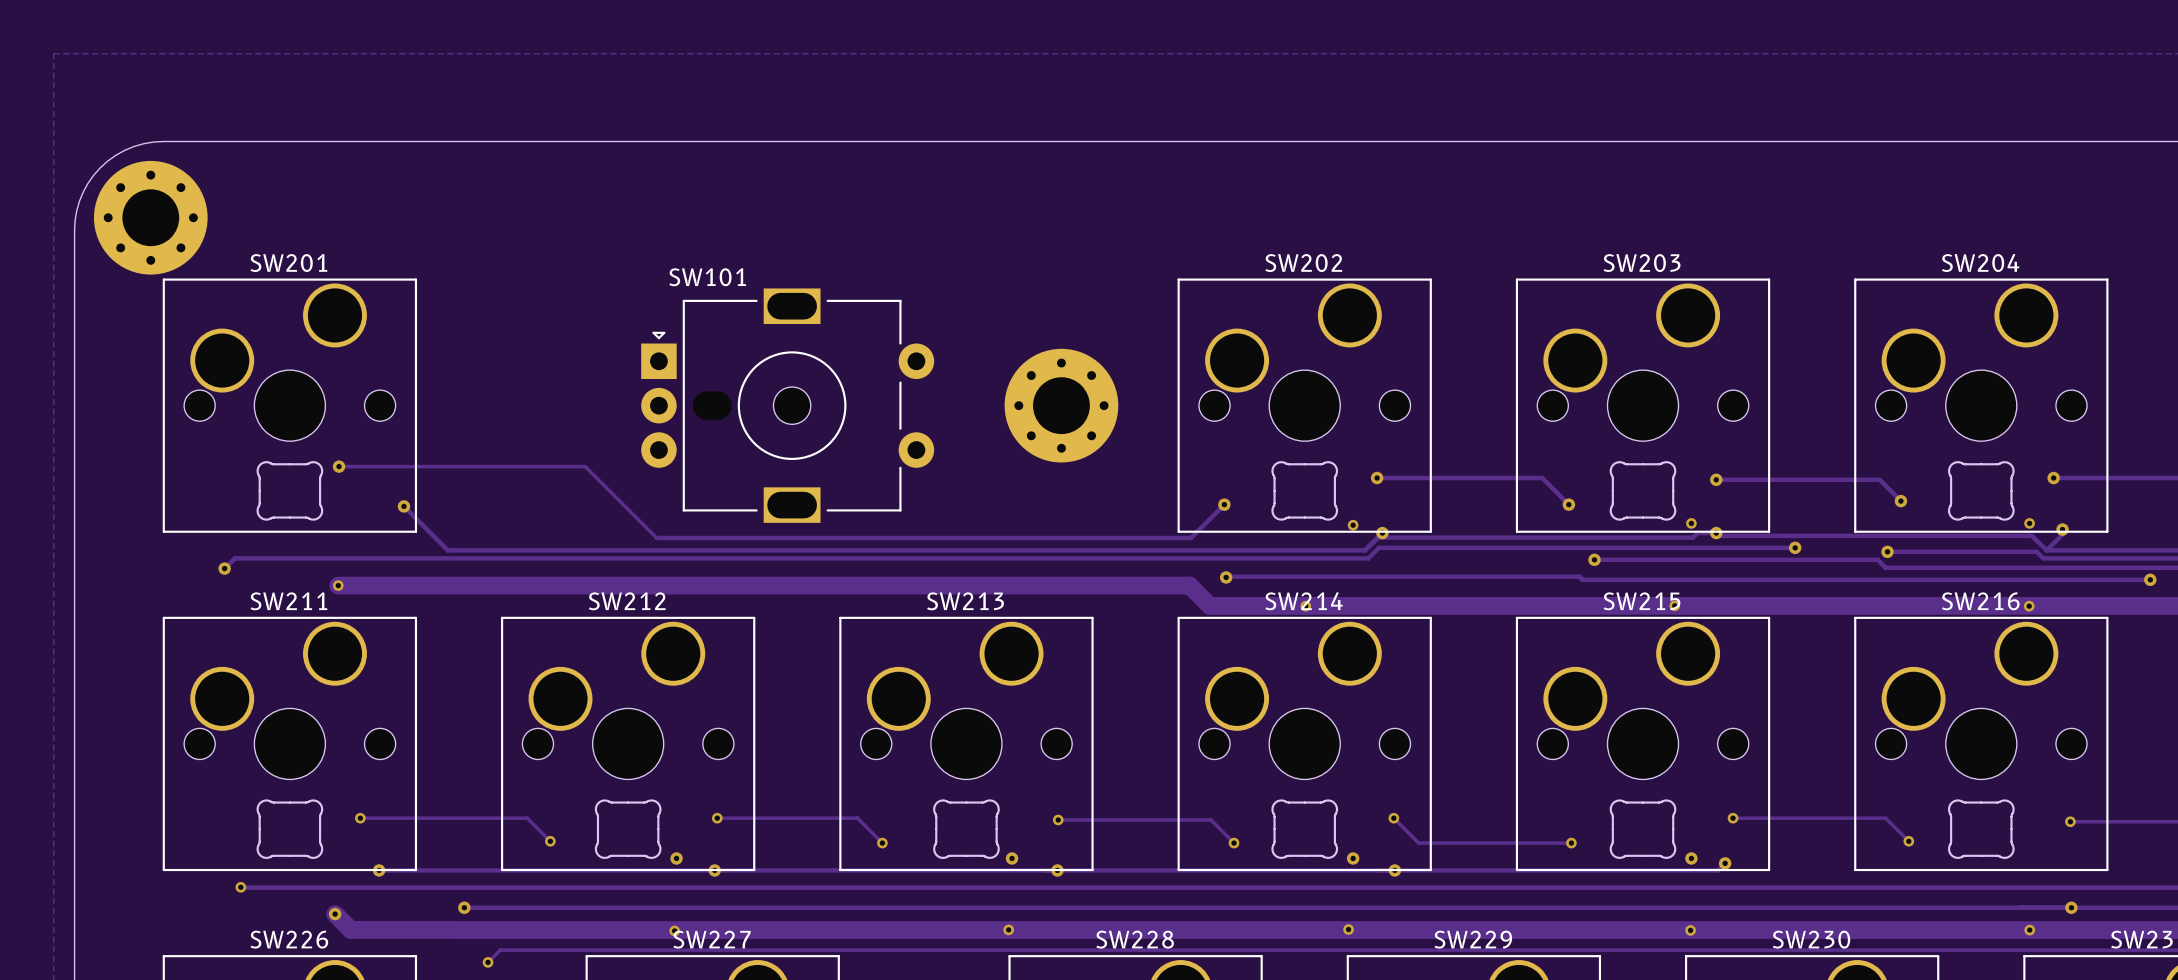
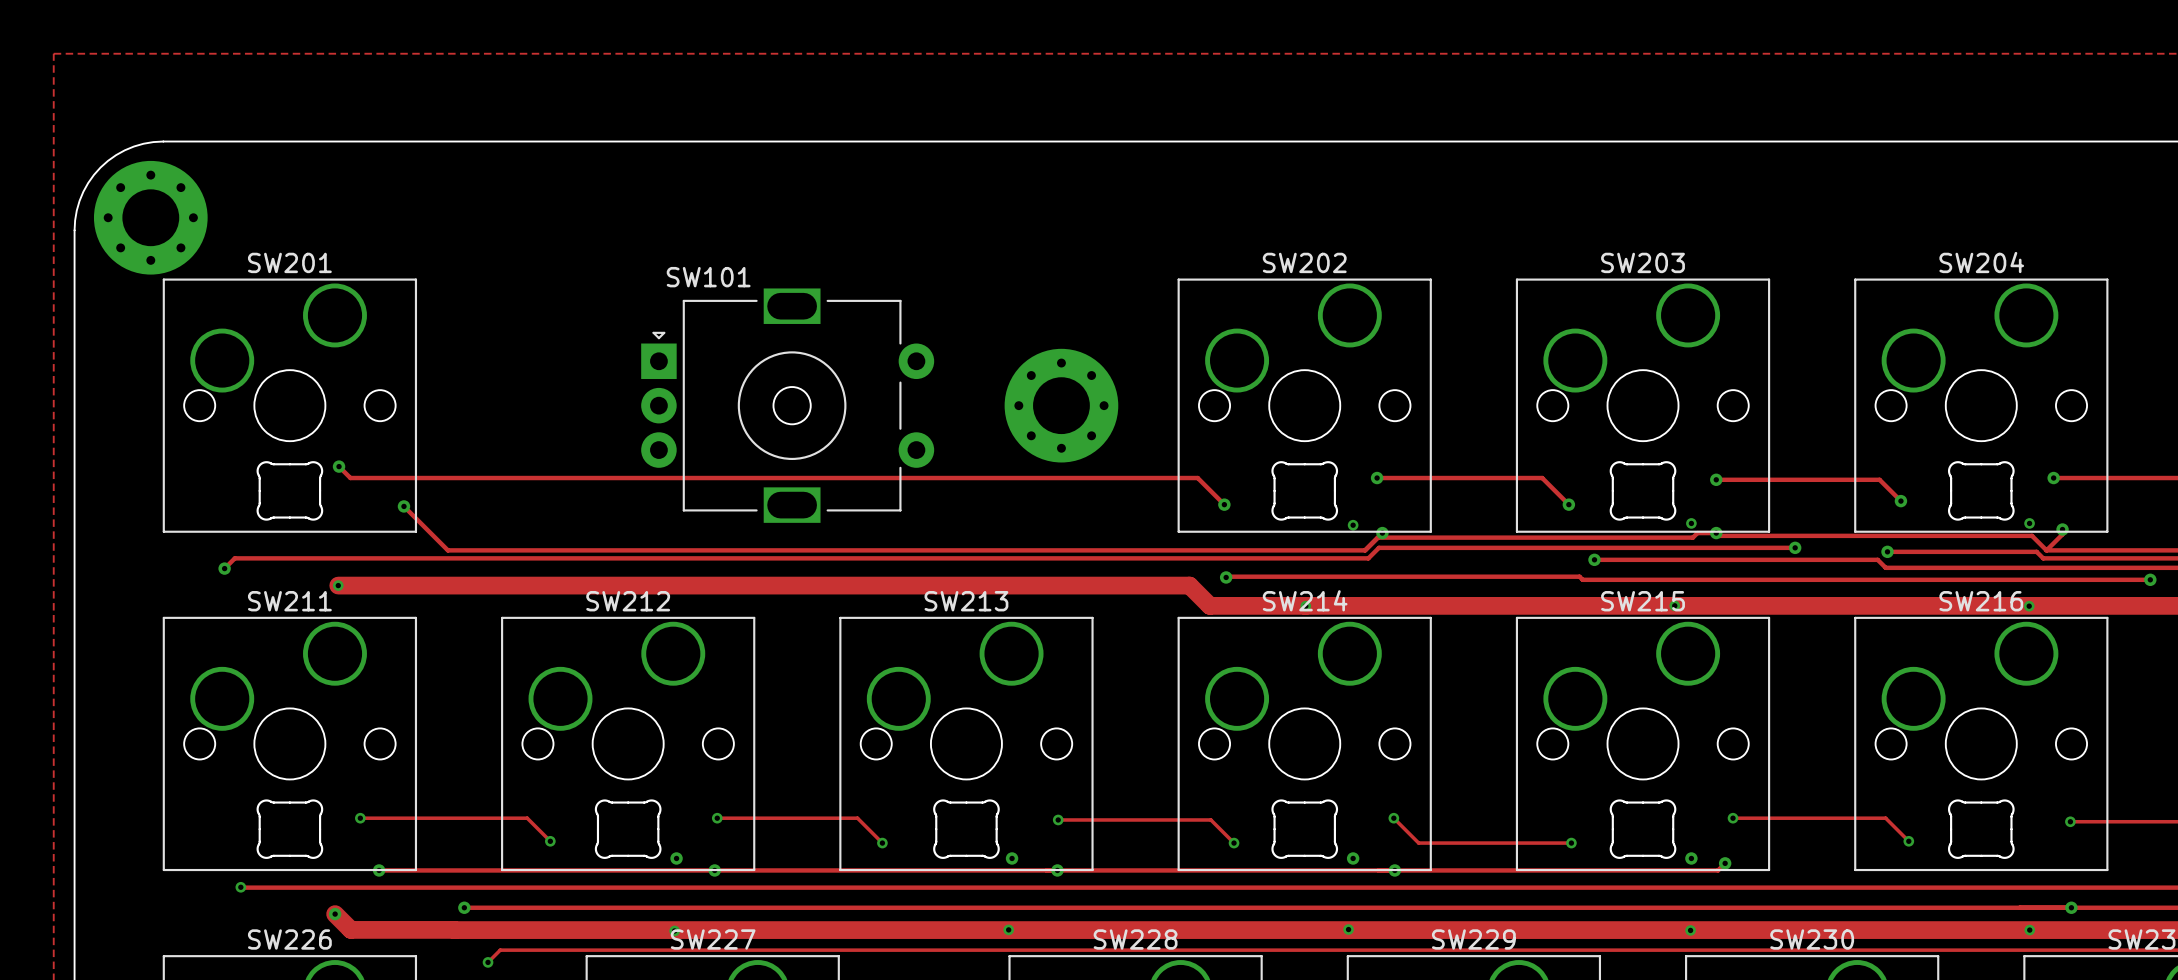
track: (339, 466) (585, 466) (656, 537) (1191, 537) (1224, 504) -> (339, 466) (350, 478) (1197, 478) (1224, 504)

